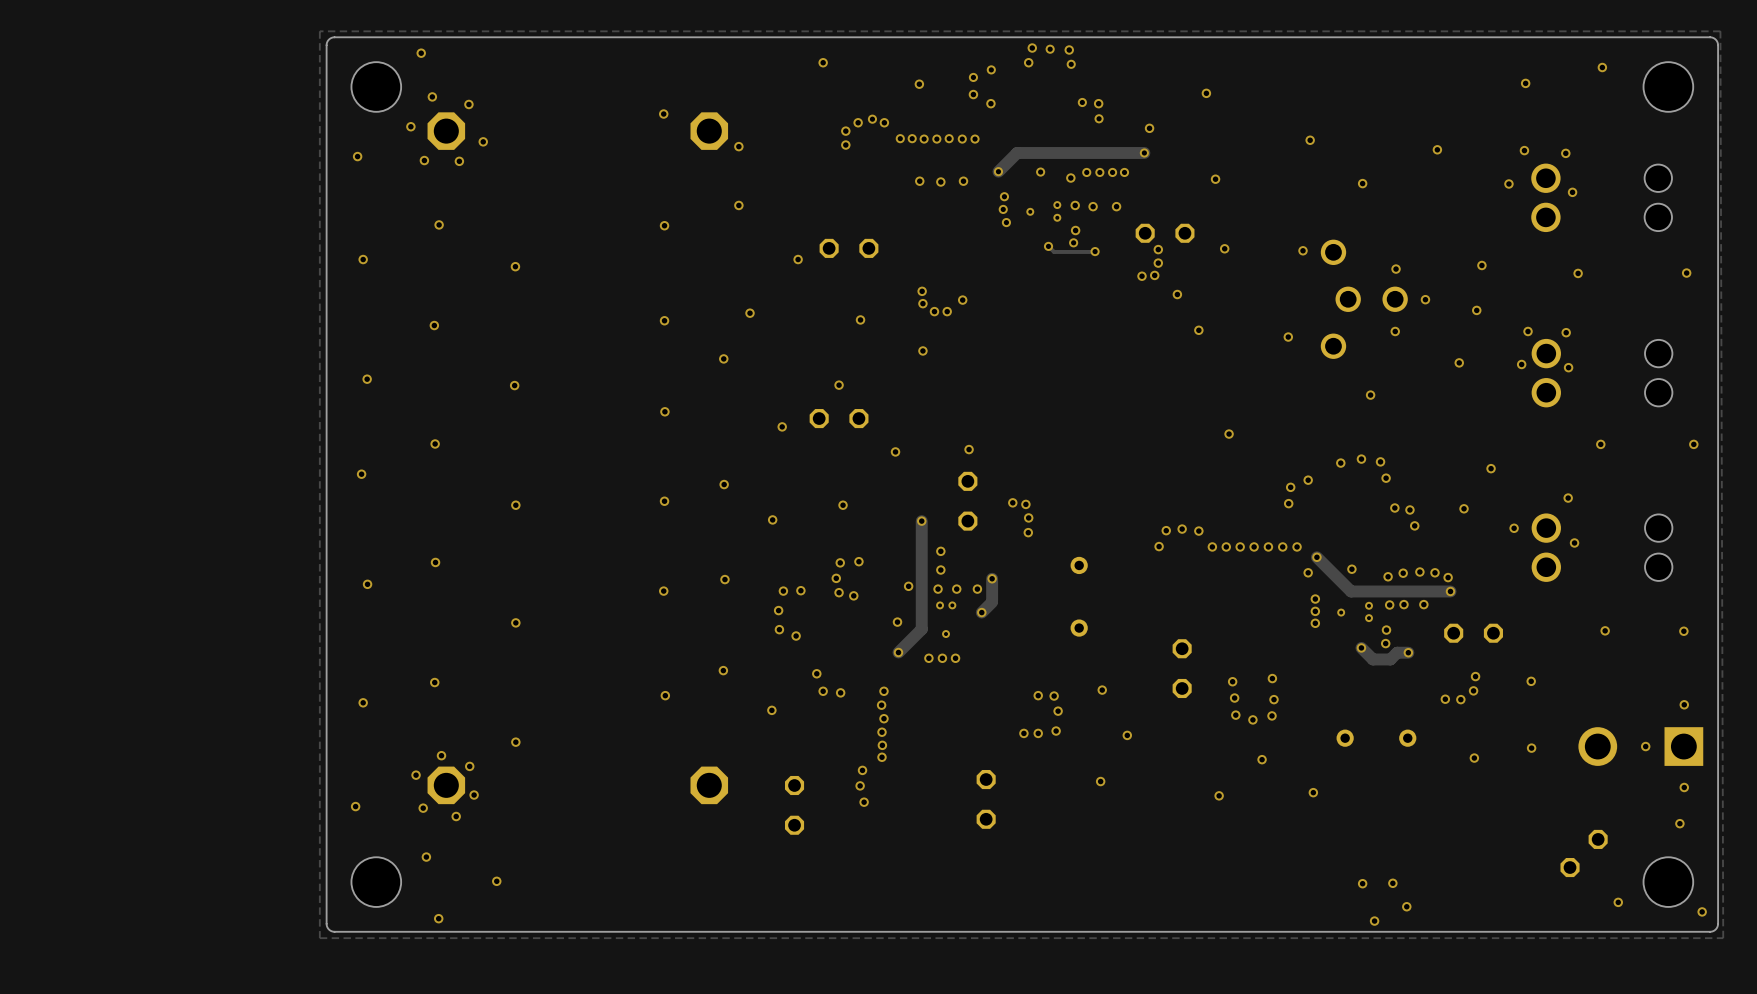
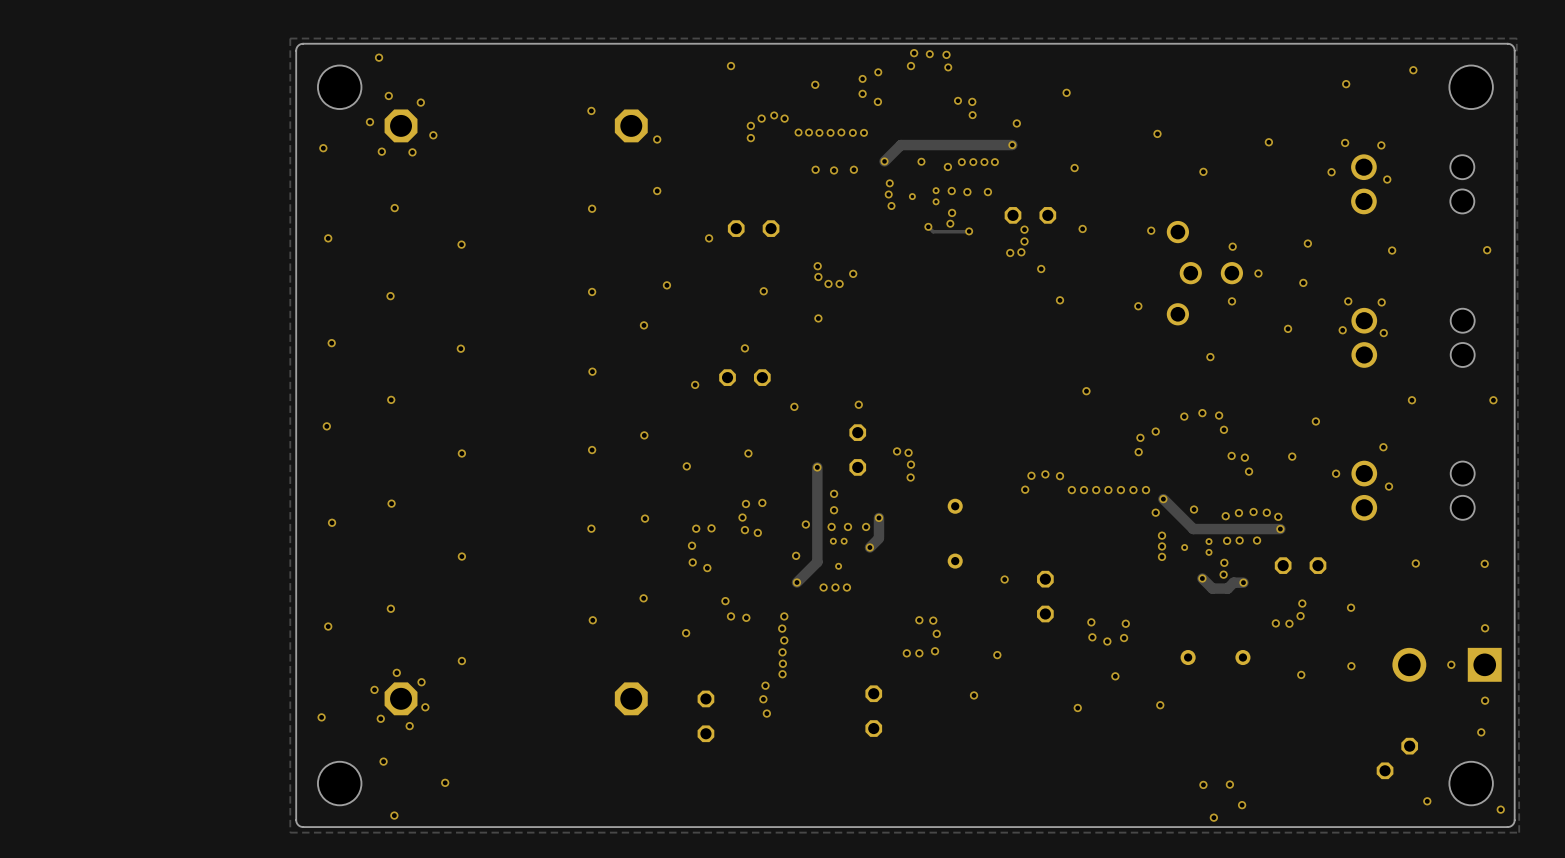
via: none -> (1004, 579)
via: (1272, 678) -> none
via: (1232, 681) -> none
via: (1102, 690) -> none

